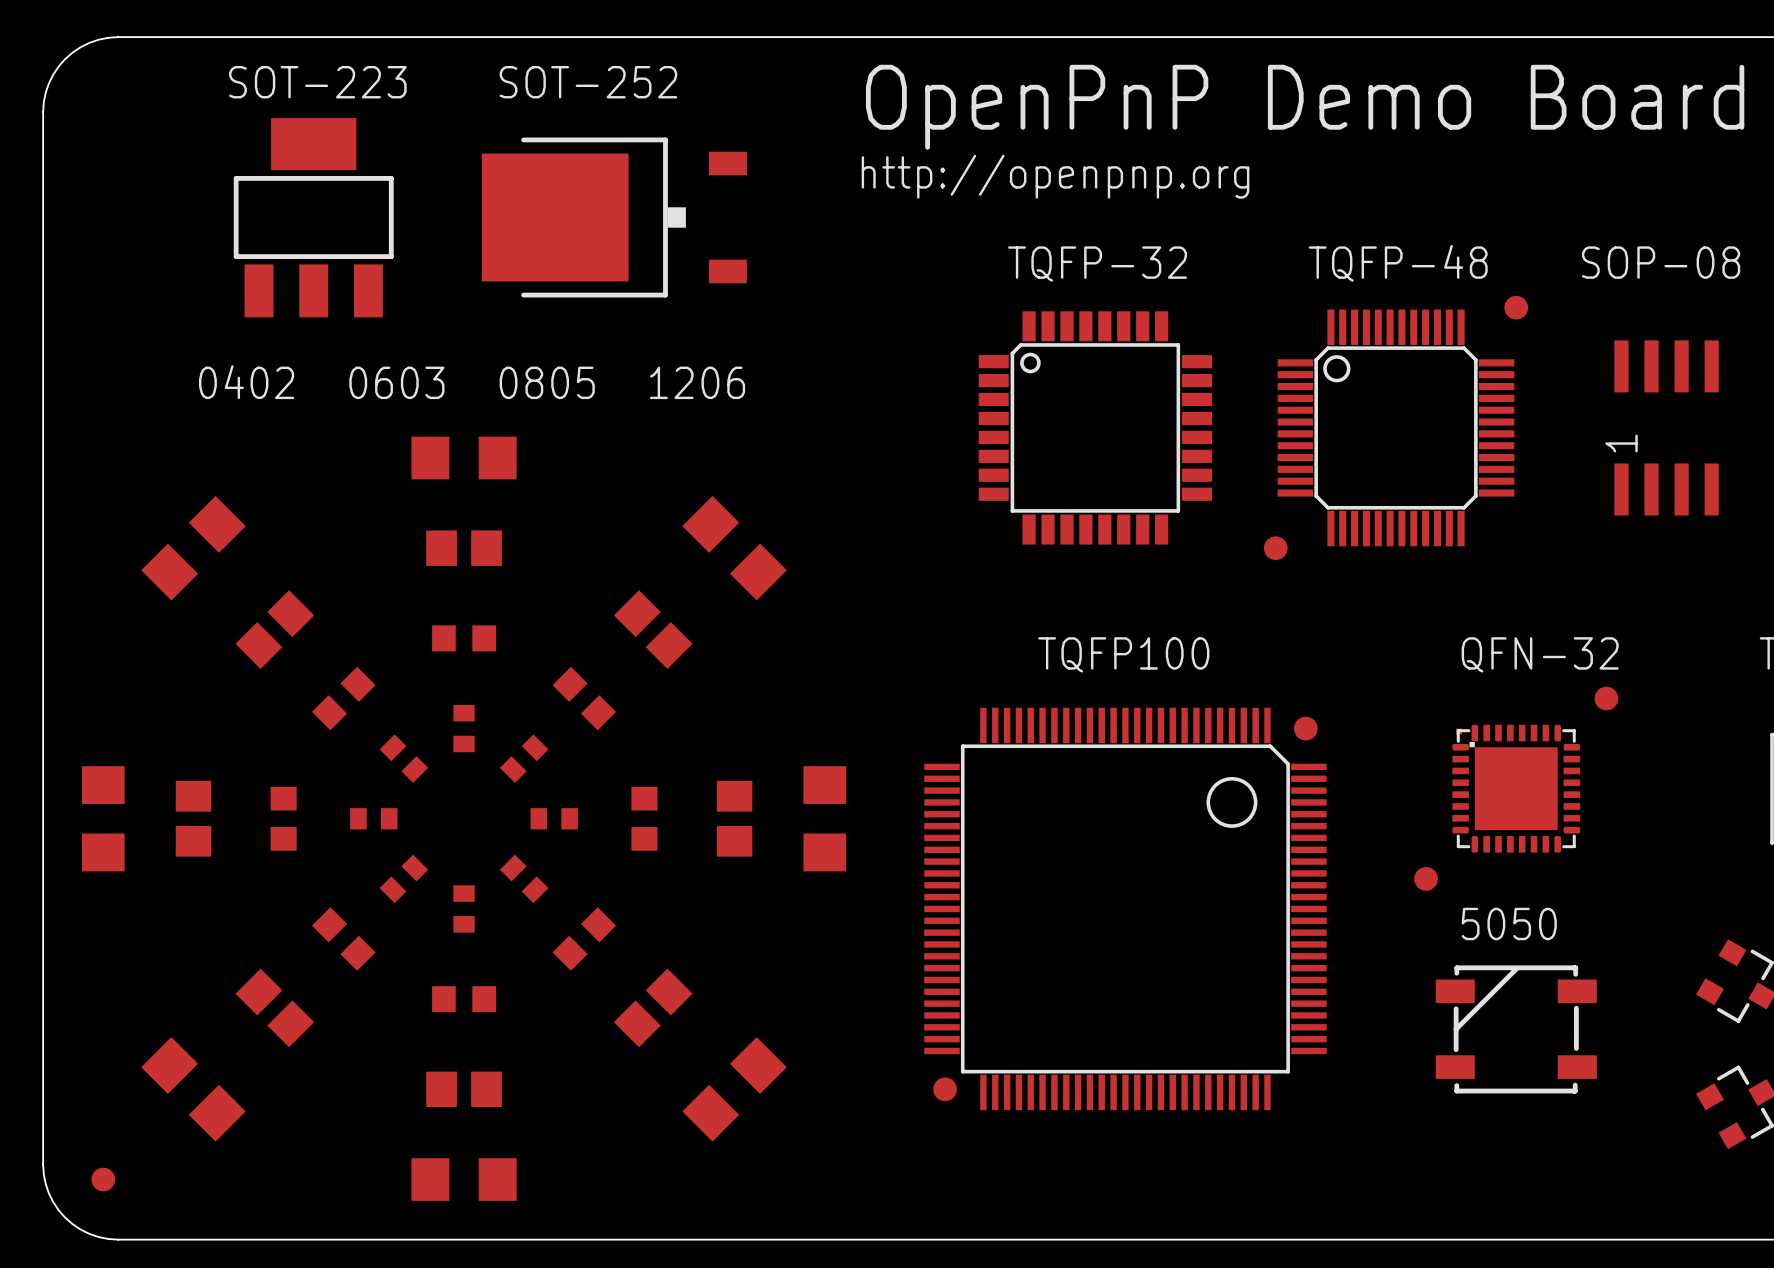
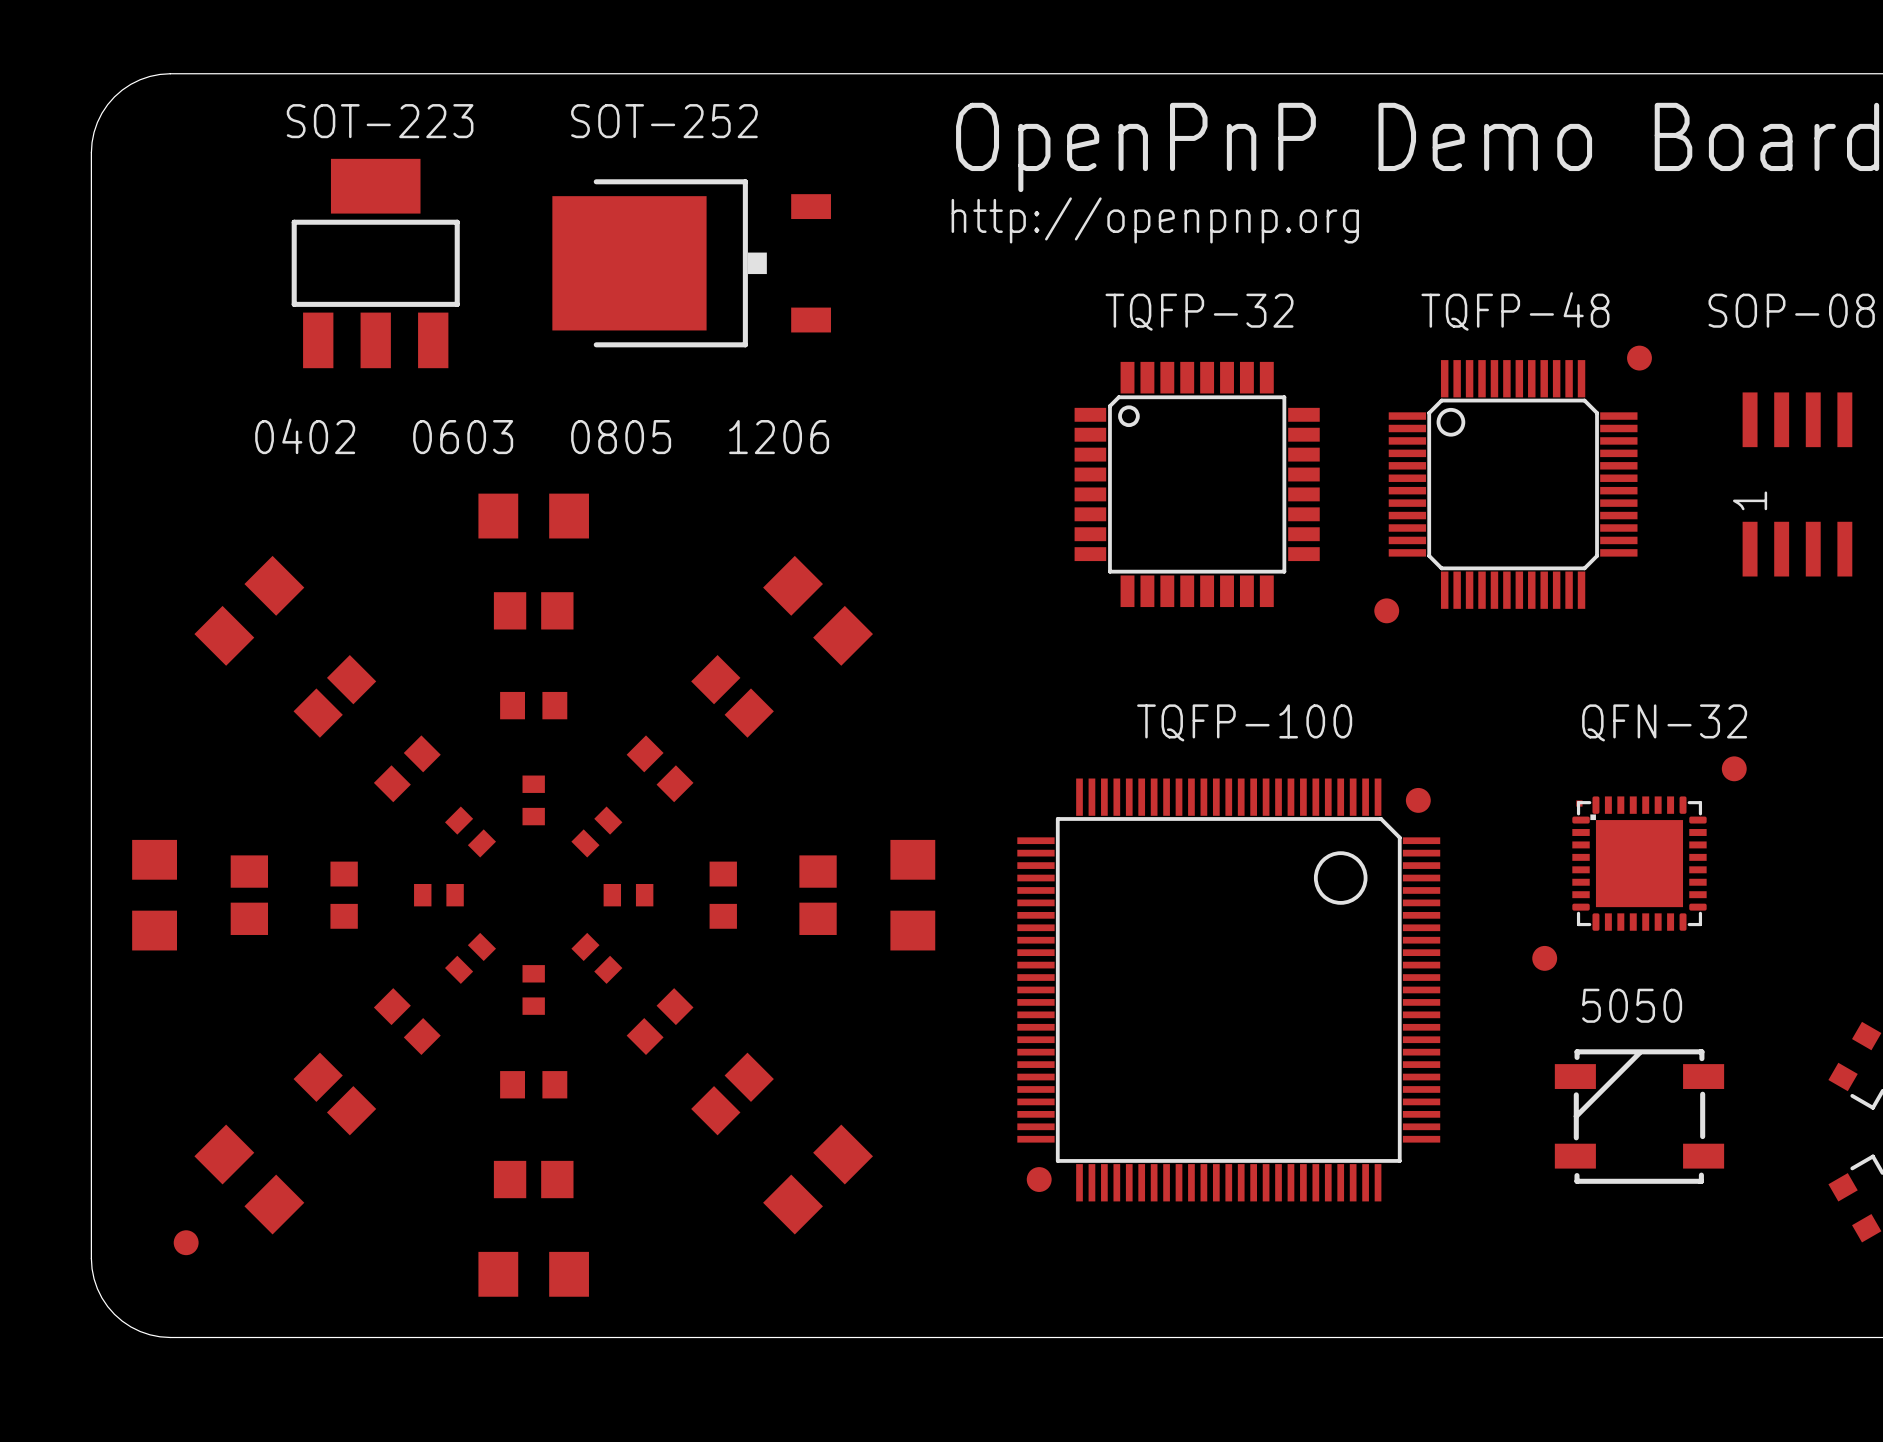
text: TQFP100 (1123, 654) -> TQFP-100 (1244, 722)
part position: (103, 1179) -> (186, 1242)

